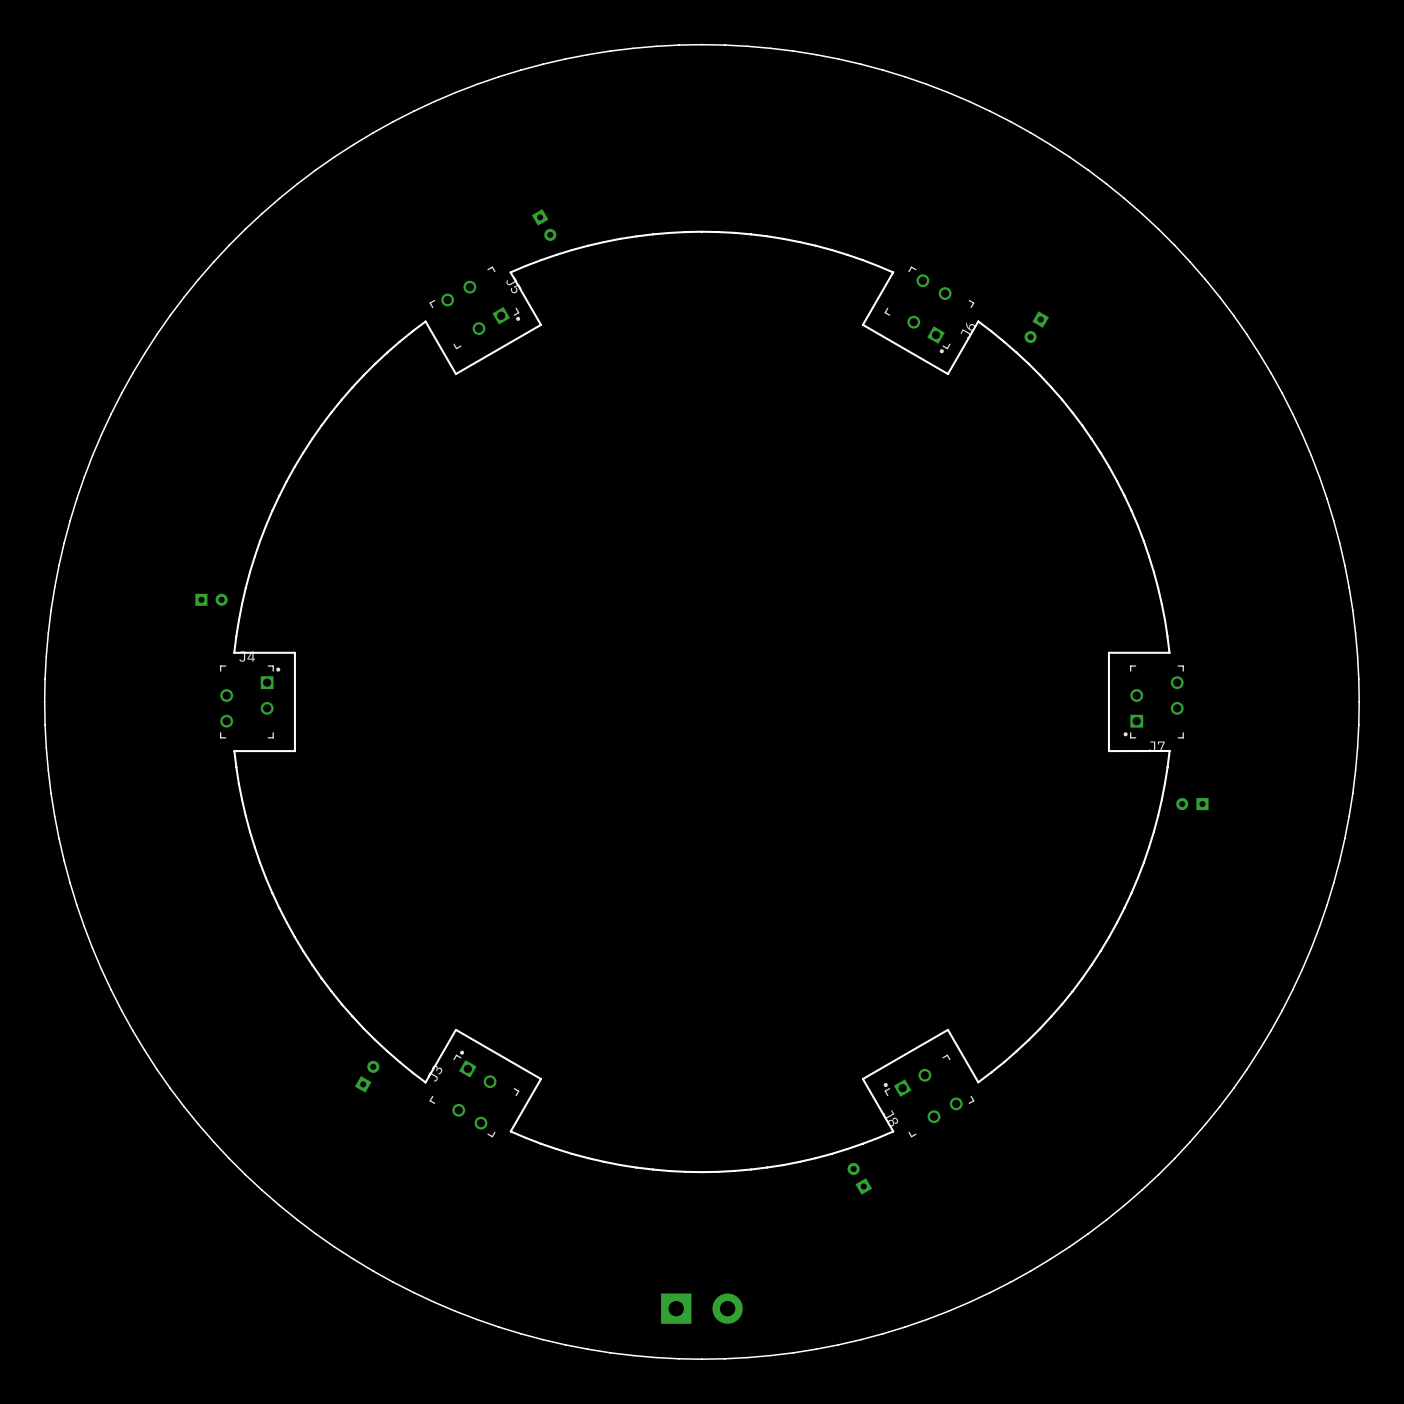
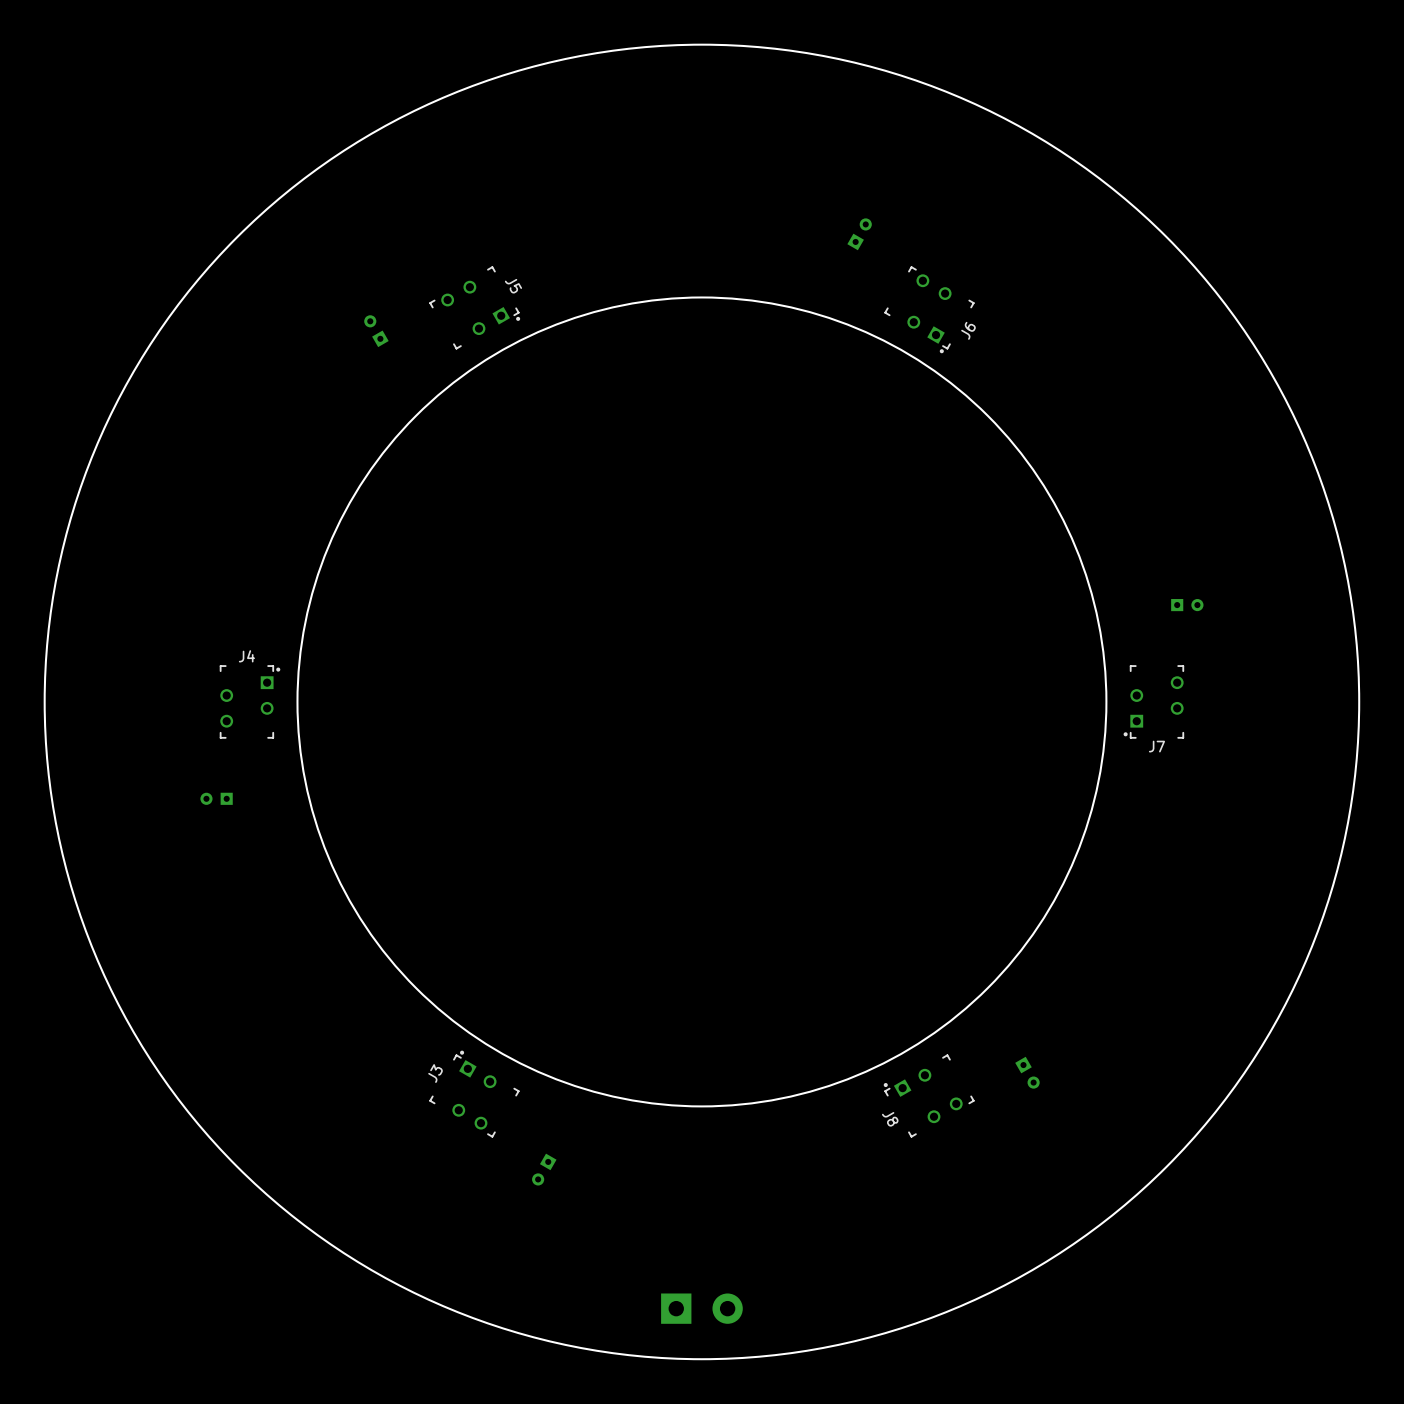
round board edge: none -> [43, 43, 1361, 1361]
board edge: (701, 44) (633, 48) (565, 59) (498, 76) (455, 92) (393, 121) (334, 157) (279, 198) (229, 245) (184, 297) (157, 334) (121, 393) (92, 455) (76, 498) (59, 565) (48, 633) (44, 701) (48, 770) (59, 838) (76, 905) (92, 948) (121, 1010) (157, 1069) (198, 1124) (245, 1174) (297, 1219) (334, 1246) (393, 1282) (455, 1311) (498, 1327) (565, 1344) (633, 1355) (701, 1359) (770, 1355) (838, 1344) (905, 1327) (948, 1311) (1010, 1282) (1069, 1246) (1124, 1205) (1174, 1158) (1219, 1106) (1246, 1069) (1282, 1010) (1311, 948) (1327, 905) (1344, 838) (1355, 770) (1359, 701) (1355, 633) (1344, 565) (1327, 498) (1311, 455) (1282, 393) (1246, 334) (1205, 279) (1158, 229) (1106, 184) (1069, 157) (1010, 121) (948, 92) (905, 76) (838, 59) (770, 48) (701, 44) -> none
part rotation: 0° (544, 225) -> 180° (376, 331)
part position: (544, 225) -> (376, 331)
board edge: (701, 231) (751, 234) (799, 242) (847, 254) (893, 272) (862, 324) (947, 374) (978, 321) (1016, 352) (1051, 387) (1091, 439) (1124, 495) (1149, 556) (1165, 620) (1169, 652) (1108, 652) (1108, 751) (1169, 750) (1161, 799) (1153, 831) (1143, 862) (1124, 908) (1100, 951) (1072, 991) (1040, 1028) (1016, 1051) (978, 1082) (947, 1029) (862, 1079) (893, 1131) (847, 1149) (799, 1161) (751, 1169) (701, 1172) (652, 1169) (604, 1161) (556, 1149) (510, 1131) (540, 1079) (455, 1029) (425, 1082) (387, 1051) (352, 1016) (312, 964) (279, 908) (254, 847) (238, 783) (234, 751) (294, 751) (294, 652) (234, 652) (242, 604) (249, 572) (266, 525) (286, 481) (312, 439) (331, 412) (352, 387) (387, 352) (425, 321) (455, 374) (540, 324) (510, 272) (556, 254) (604, 242) (652, 234) (701, 231) -> none
round board edge: none -> [296, 296, 1108, 1108]
part rotation: 0° (1036, 327) -> 180° (859, 234)
part position: (1036, 327) -> (859, 234)
part rotation: 0° (211, 599) -> 180° (216, 798)
part position: (211, 599) -> (216, 798)
part rotation: 0° (1192, 804) -> 180° (1187, 605)
part position: (1192, 804) -> (1187, 605)
part rotation: 0° (367, 1076) -> 180° (544, 1169)
part position: (367, 1076) -> (544, 1169)
part rotation: 0° (859, 1178) -> 180° (1027, 1072)
part position: (859, 1178) -> (1027, 1072)

